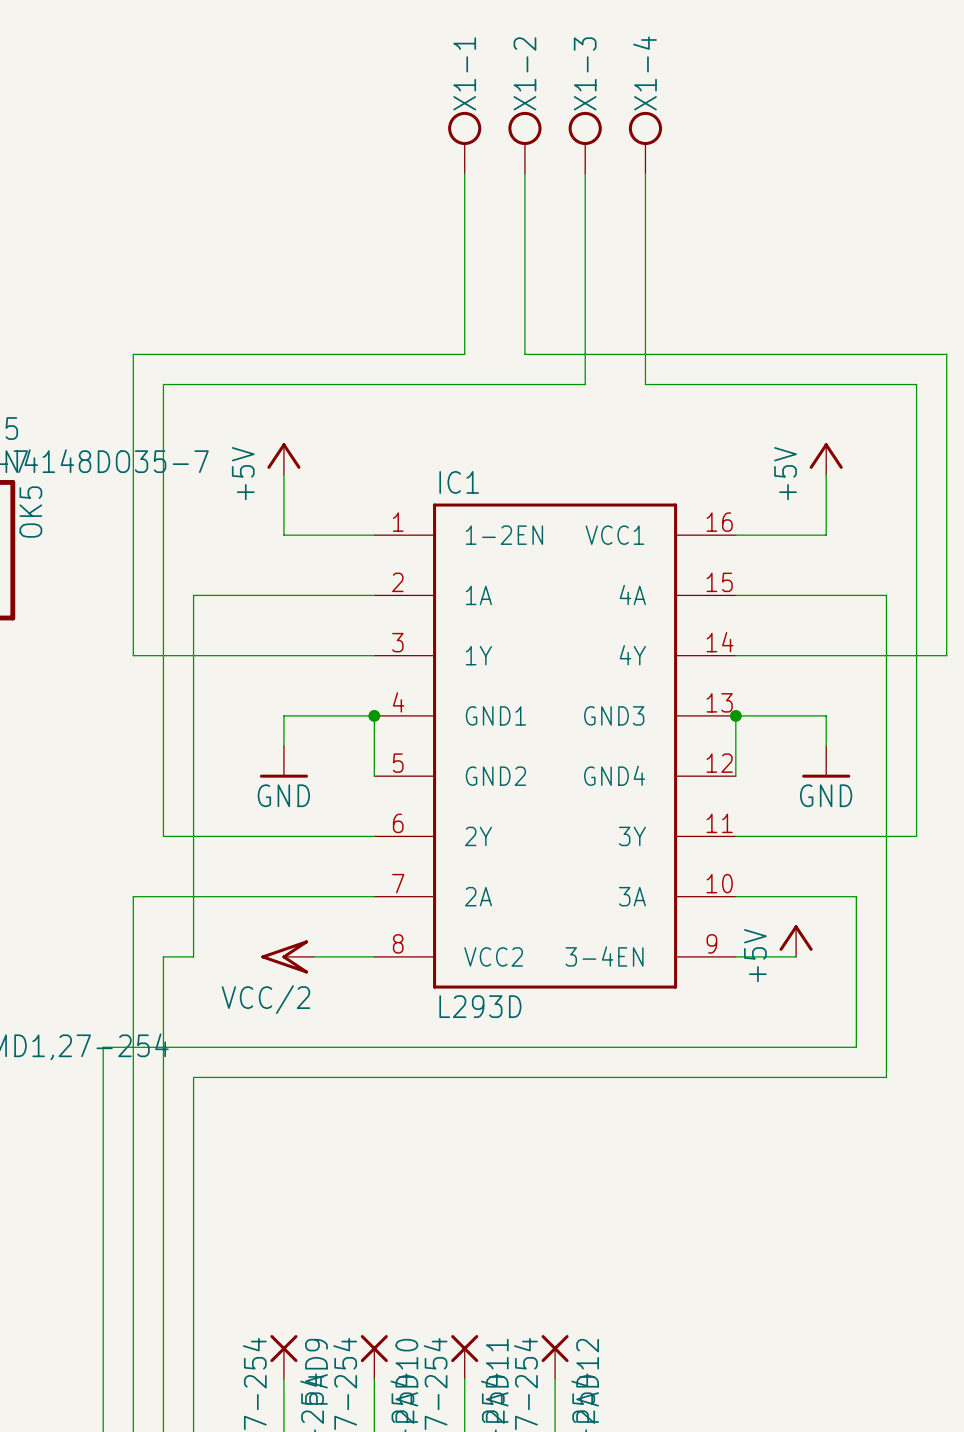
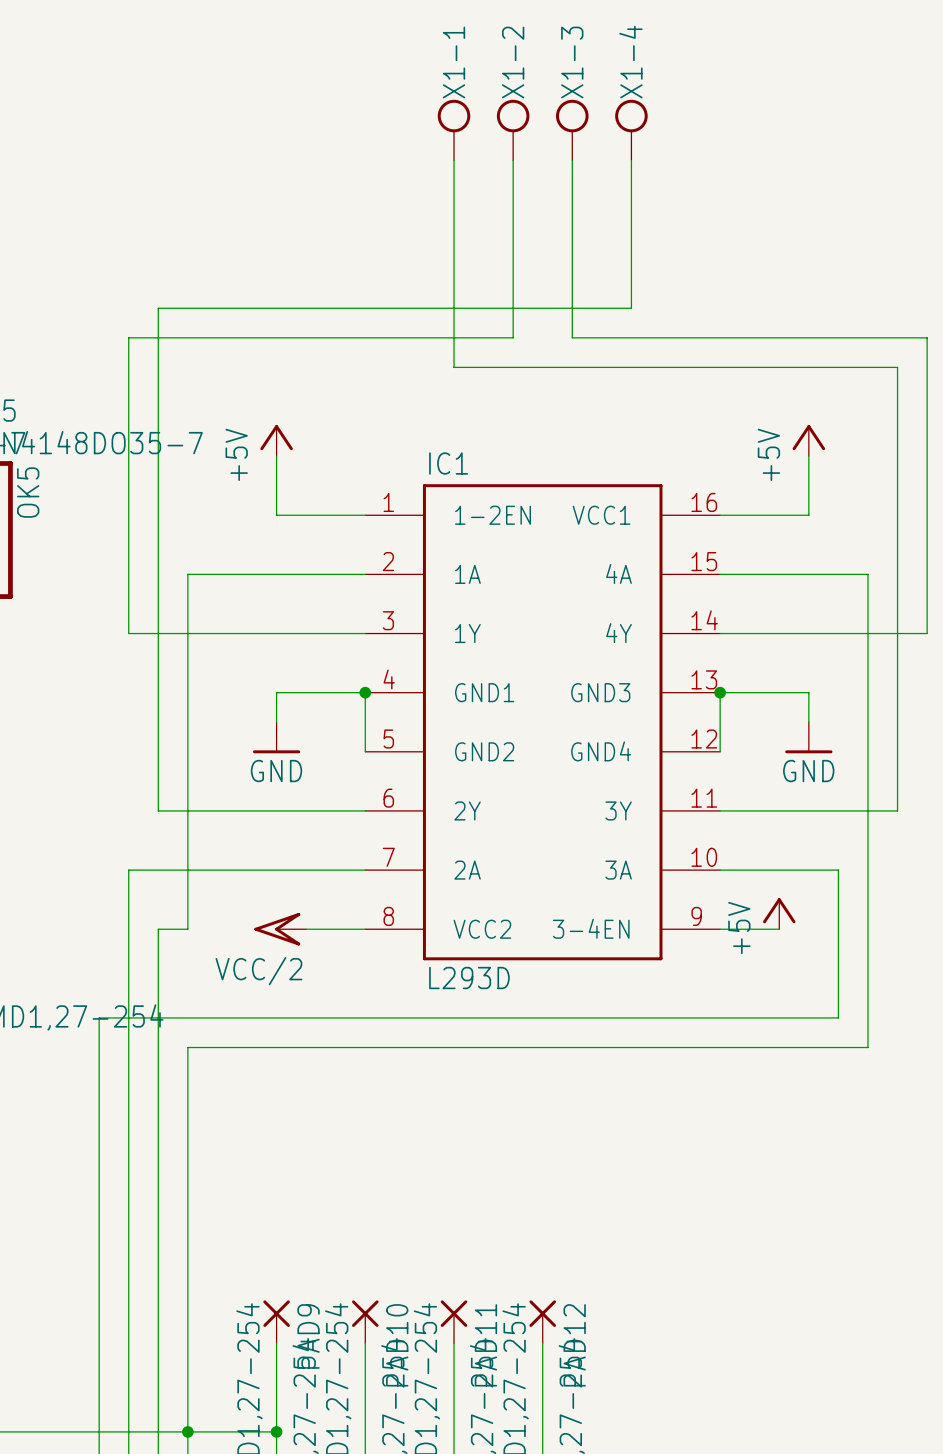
wire: (645, 324) (645, 384) -> (572, 367) (631, 367)
wire: (524, 354) (585, 354) (585, 384) -> (513, 337) (454, 337) (454, 367)
wire: (163, 384) (464, 384) -> (158, 367) (158, 308) (631, 308)

